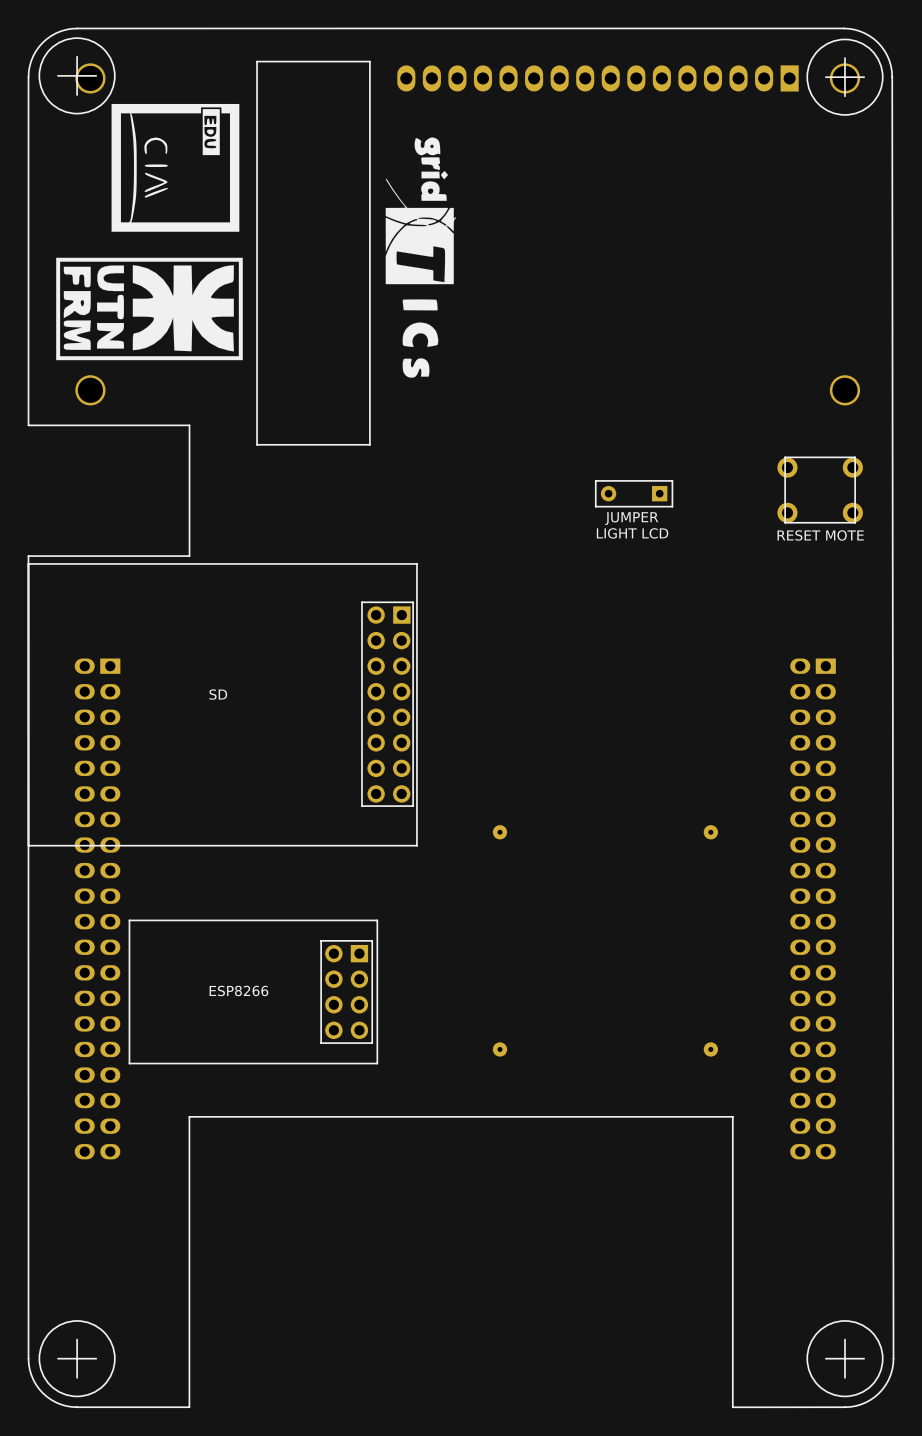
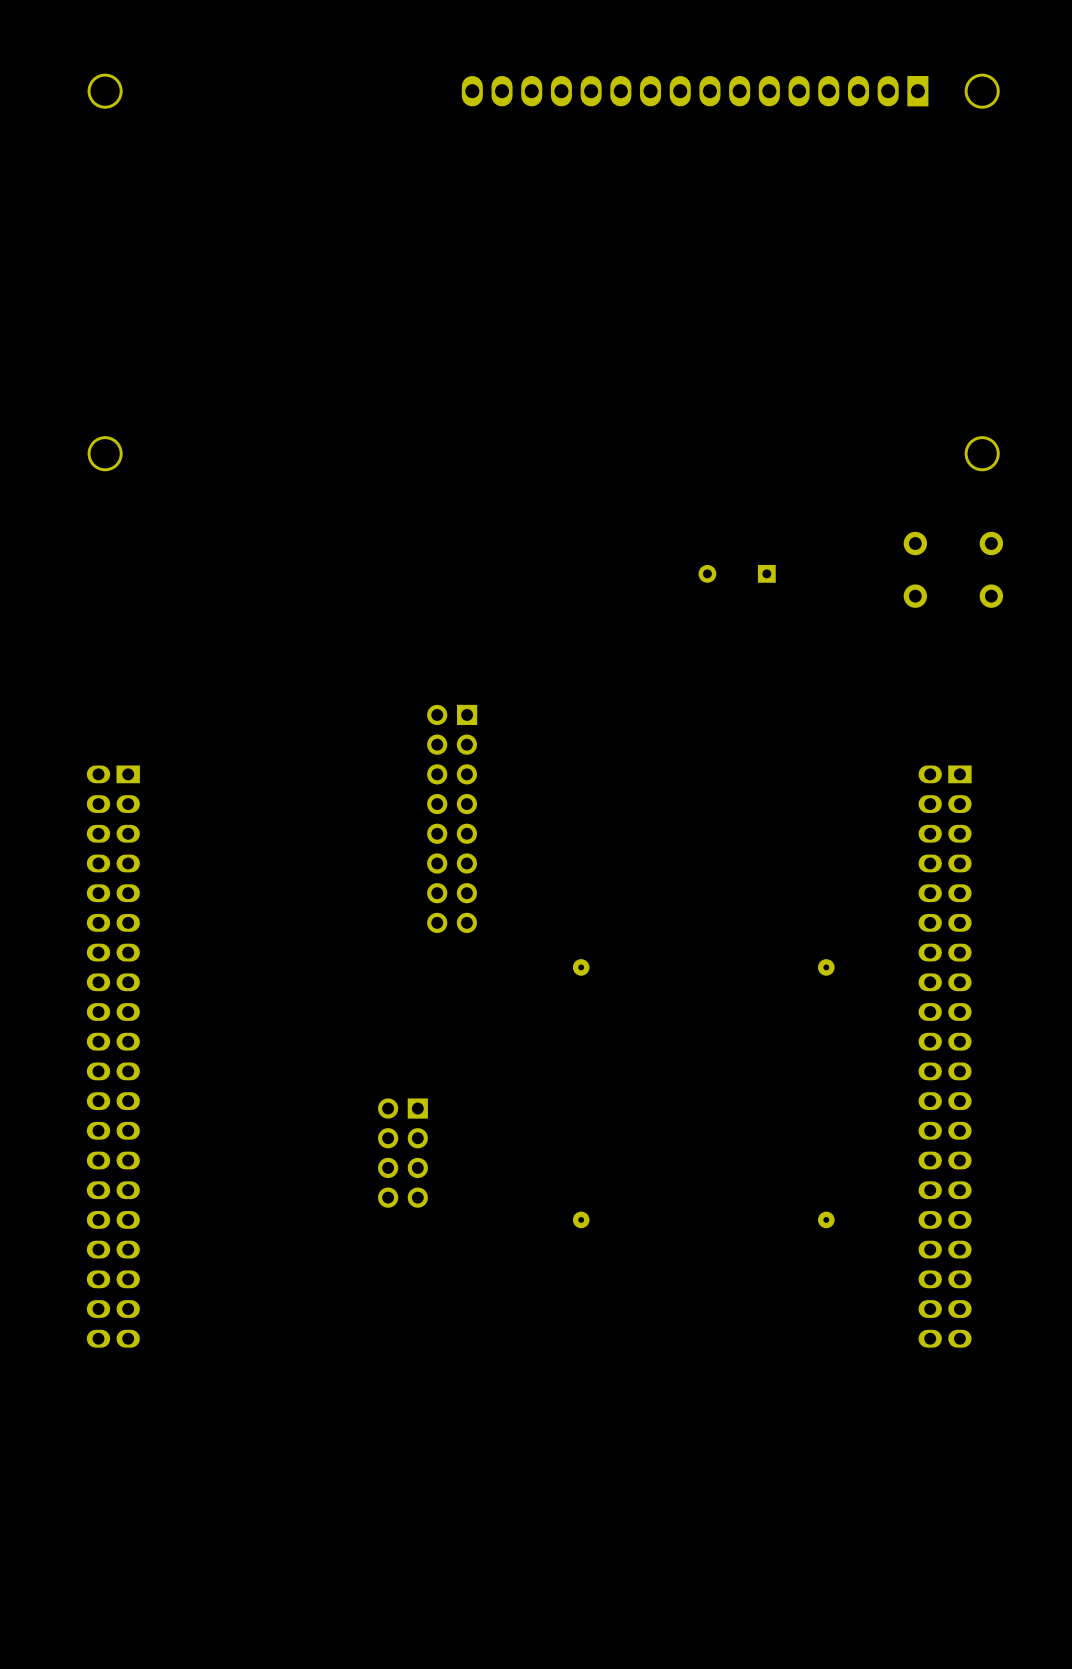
line: (843, 28) (77, 28) (56, 33) (46, 39) (35, 51) (31, 60) (28, 77) (28, 425) (189, 425) (189, 556) (28, 556) (28, 1358) (33, 1379) (42, 1393) (51, 1399) (61, 1404) (77, 1407) (189, 1407) (189, 1116) (732, 1116) (732, 1407) (850, 1406) (870, 1399) (886, 1384) (892, 1369) (893, 1358) (892, 77) (887, 55) (878, 42) (859, 31) (843, 28) -> none
drawing: [38, 37, 240, 232] -> none
drawing: [806, 38, 884, 116] -> none
line: (77, 56) (77, 95) -> none
line: (844, 58) (844, 96) -> none
line: (369, 61) (369, 444) (257, 444) (257, 61) (369, 61) -> none
line: (96, 75) (57, 75) -> none
line: (864, 77) (825, 77) -> none
drawing: [385, 137, 457, 378] -> none
drawing: [56, 257, 243, 361] -> none
line: (855, 457) (855, 522) (785, 522) (785, 457) (855, 457) -> none
line: (672, 480) (672, 506) (595, 506) (595, 480) (672, 480) -> none
text: JUMPER (631, 518) -> none
text: LIGHT LCD (632, 533) -> none
text: RESET MOTE (820, 535) -> none
line: (416, 563) (416, 845) (28, 845) (28, 563) (416, 563) -> none
line: (413, 602) (413, 806) (362, 806) (362, 602) (413, 602) -> none
text: SD (218, 694) -> none
line: (377, 920) (377, 1063) (129, 1063) (129, 920) (377, 920) -> none
line: (372, 940) (372, 1043) (321, 1043) (321, 940) (372, 940) -> none
text: ESP8266 (238, 990) -> none
drawing: [38, 1320, 116, 1398] -> none
drawing: [806, 1320, 884, 1398] -> none
line: (77, 1339) (77, 1377) -> none
line: (844, 1339) (844, 1377) -> none
line: (96, 1358) (57, 1358) -> none
line: (864, 1358) (825, 1358) -> none

